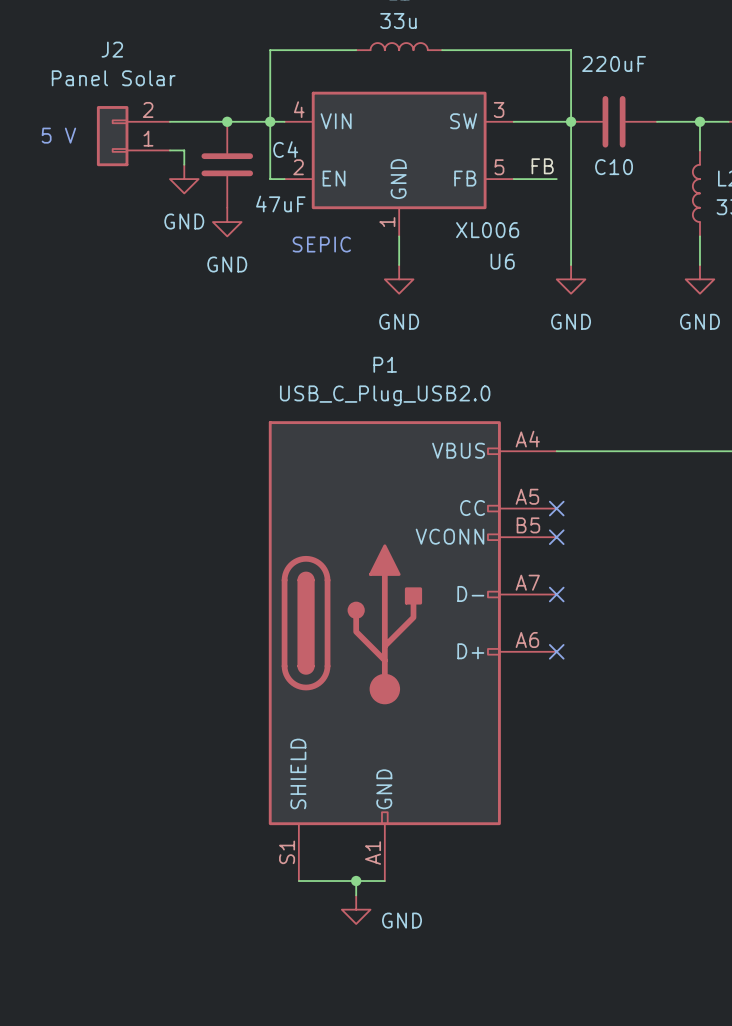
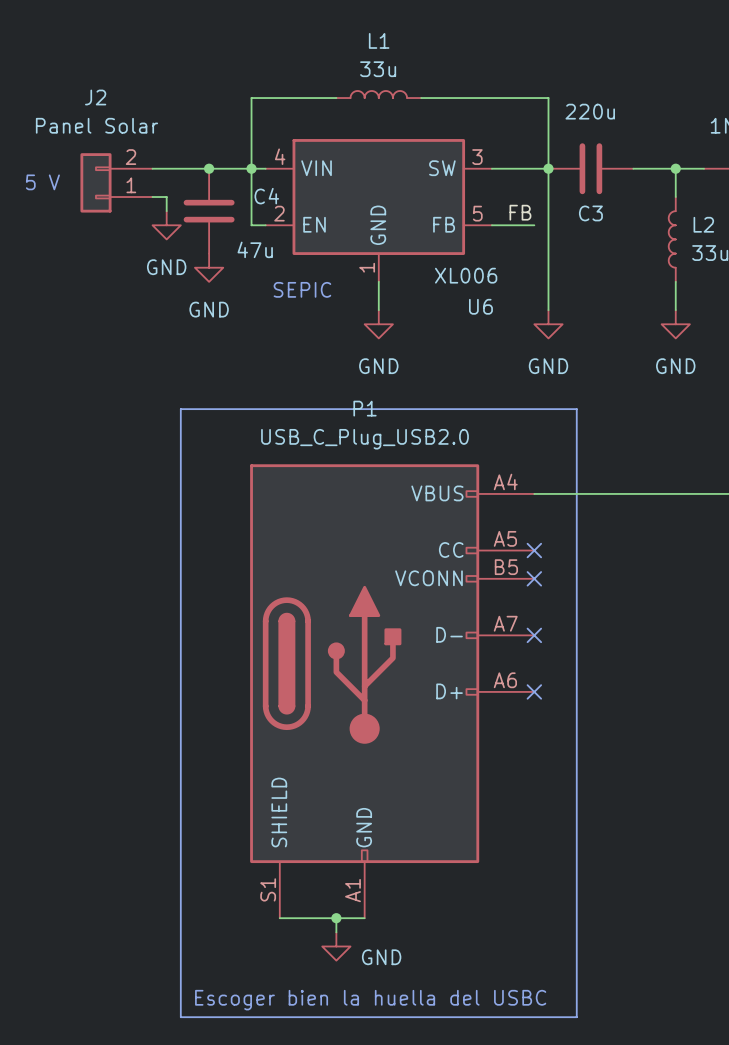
C10 value: 220uF (614, 63) -> 220u (590, 111)
C10 name: C10 (614, 167) -> C3 (590, 213)
C4 value: 47uF (280, 204) -> 47u (255, 249)
line: none -> (180, 409) (576, 409) (576, 1017) (180, 1017) (180, 409)
text: none -> Escoger bien la huella del USBC (370, 1000)

